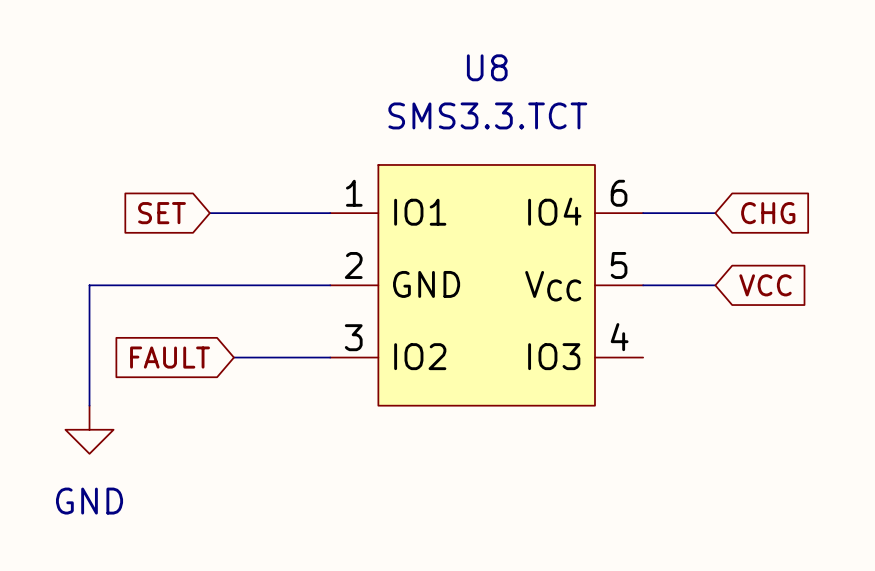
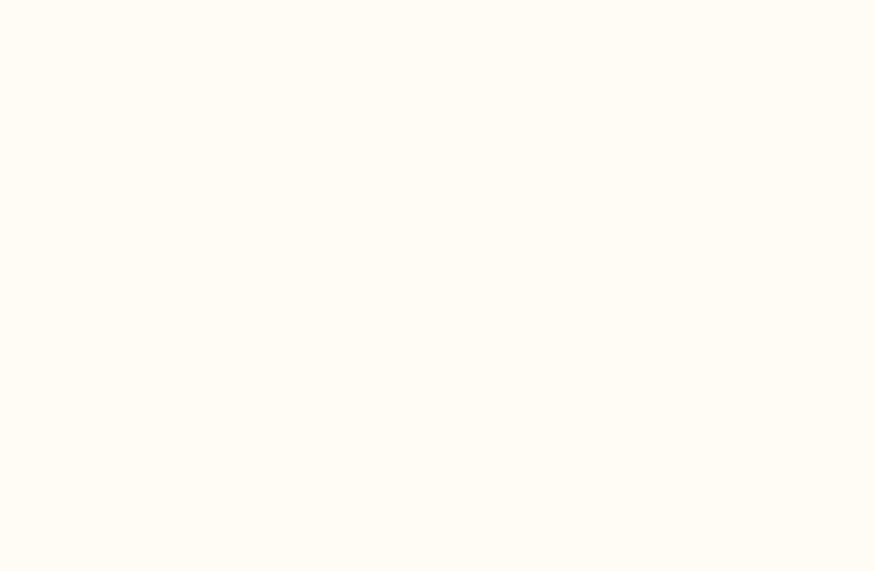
global label: SET (162, 213) -> none
wire: (209, 213) (330, 213) -> none
wire: (643, 213) (715, 213) -> none
global label: CHG (768, 213) -> none
wire: (330, 285) (89, 285) (89, 405) -> none
U8: SMS3.3.TCT (486, 285) -> none
wire: (643, 285) (715, 285) -> none
global label: VCC (765, 285) -> none
global label: FAULT (170, 357) -> none
wire: (233, 357) (330, 357) -> none
power symbol: GND (89, 429) -> none

